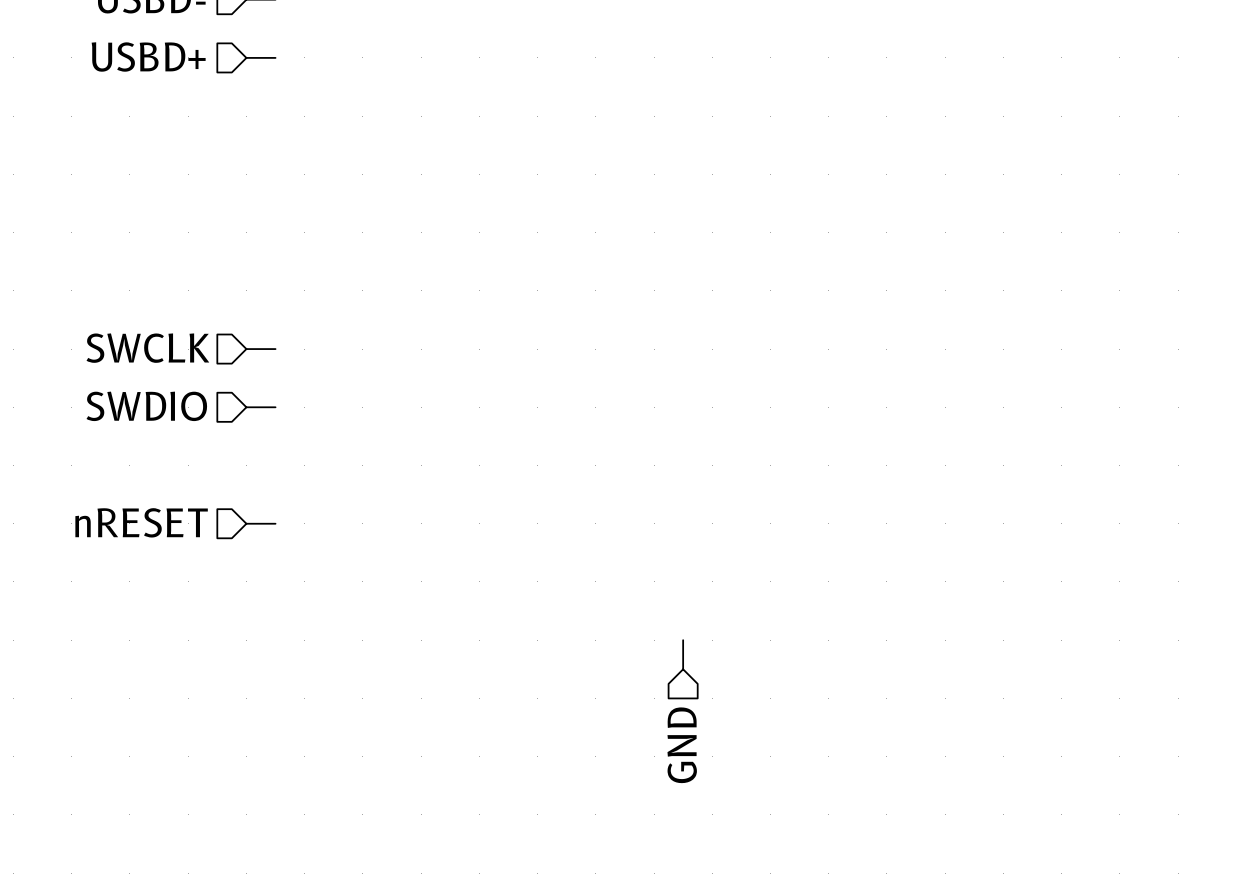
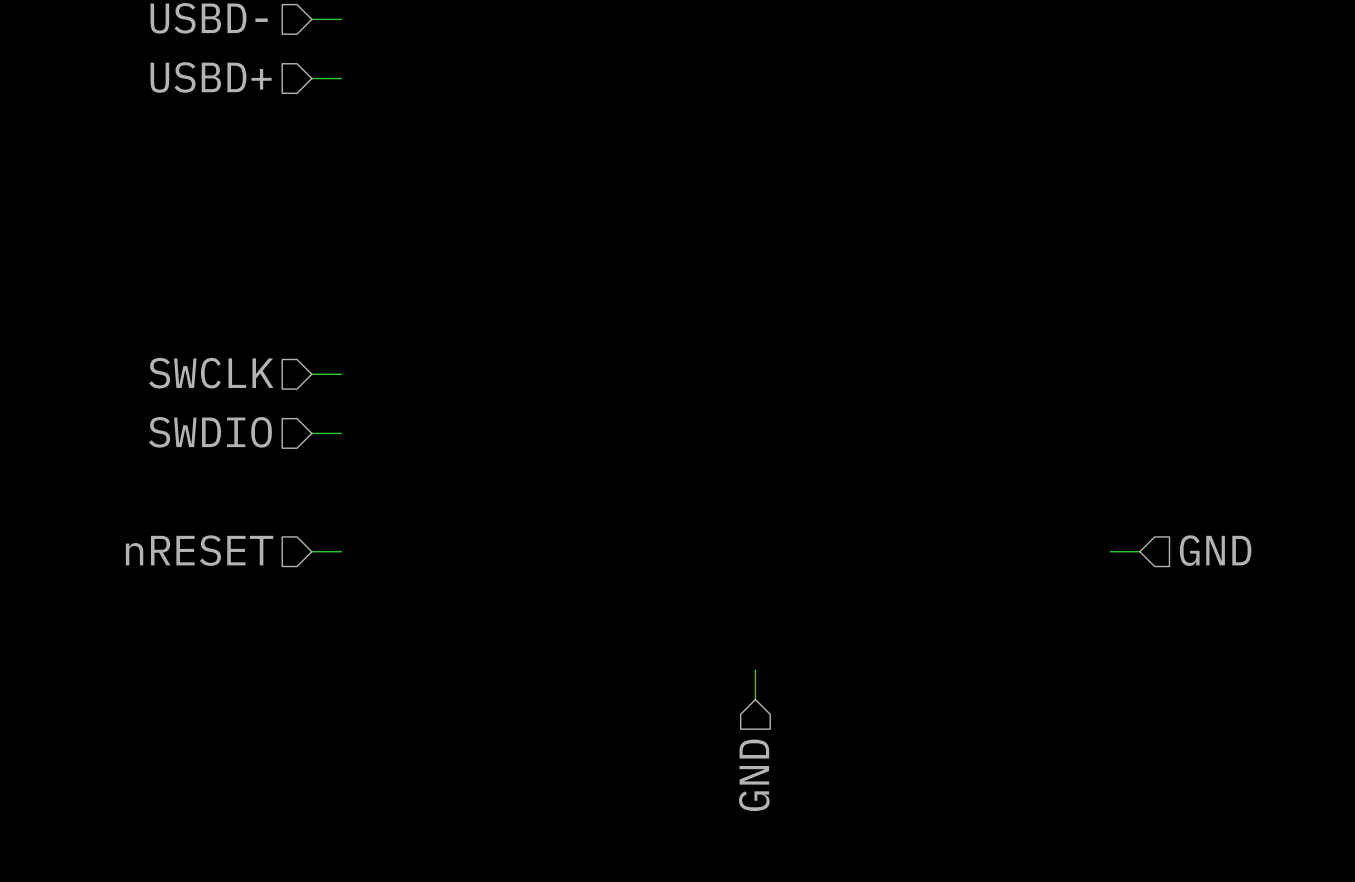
hierarchical label: none -> GND (1215, 550)
wire: none -> (1110, 551) (1139, 551)

